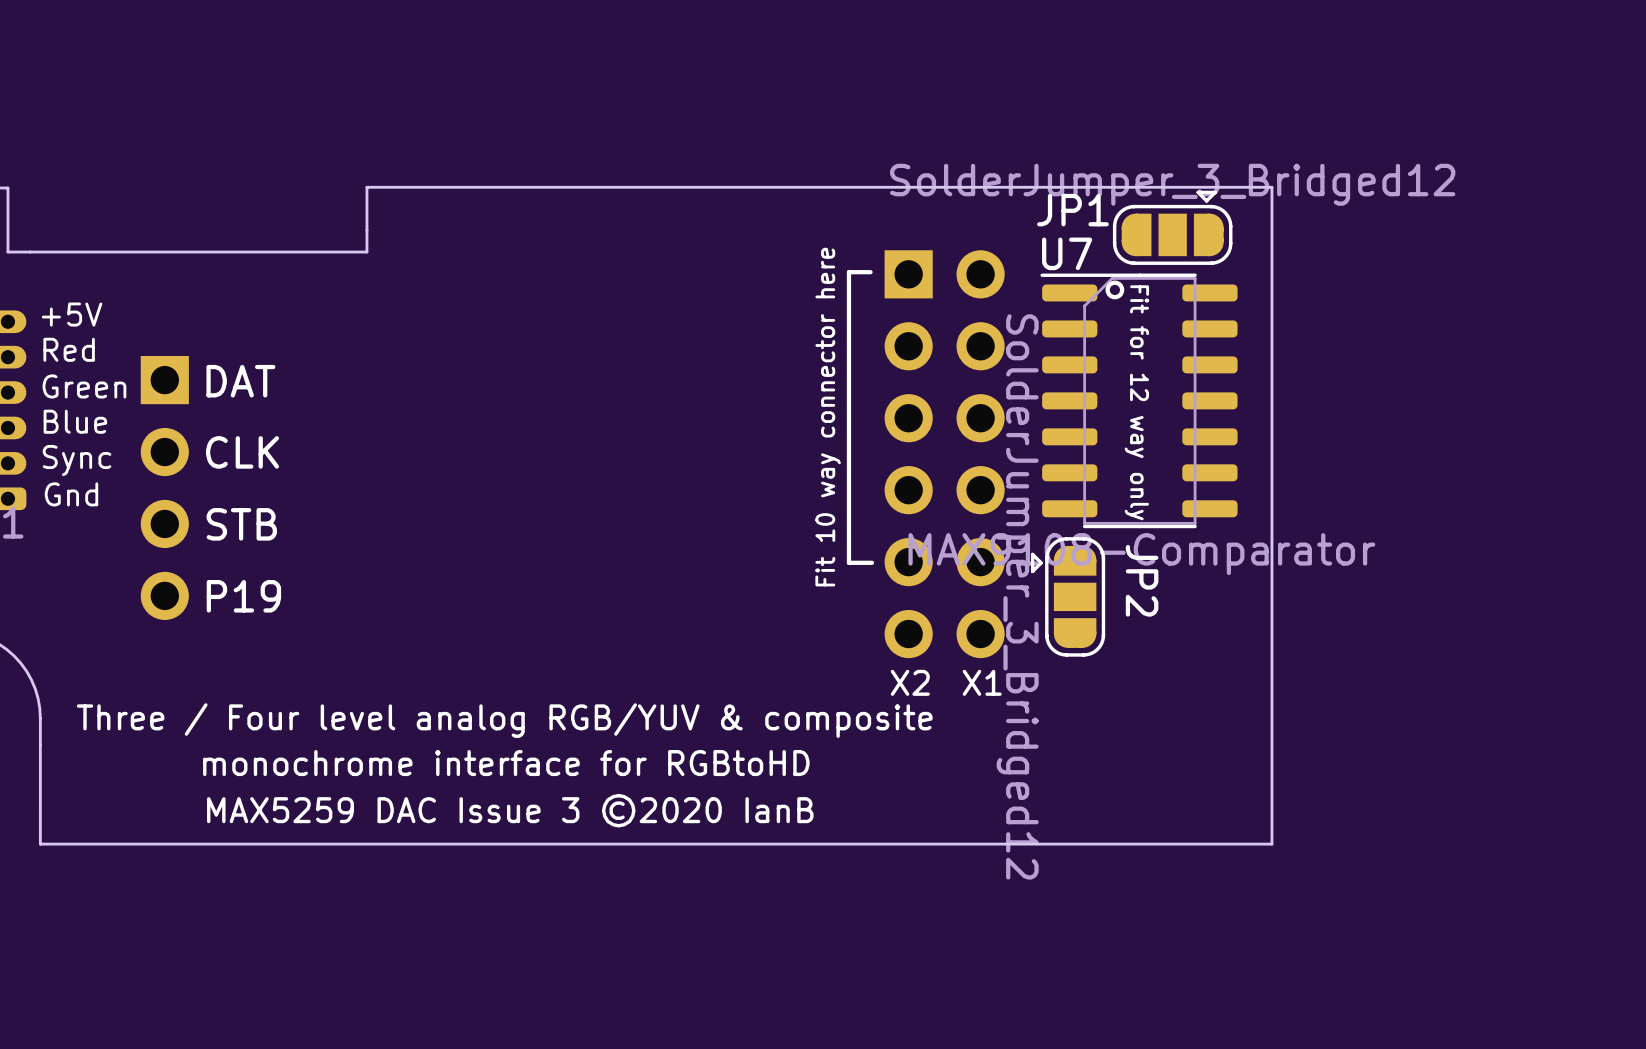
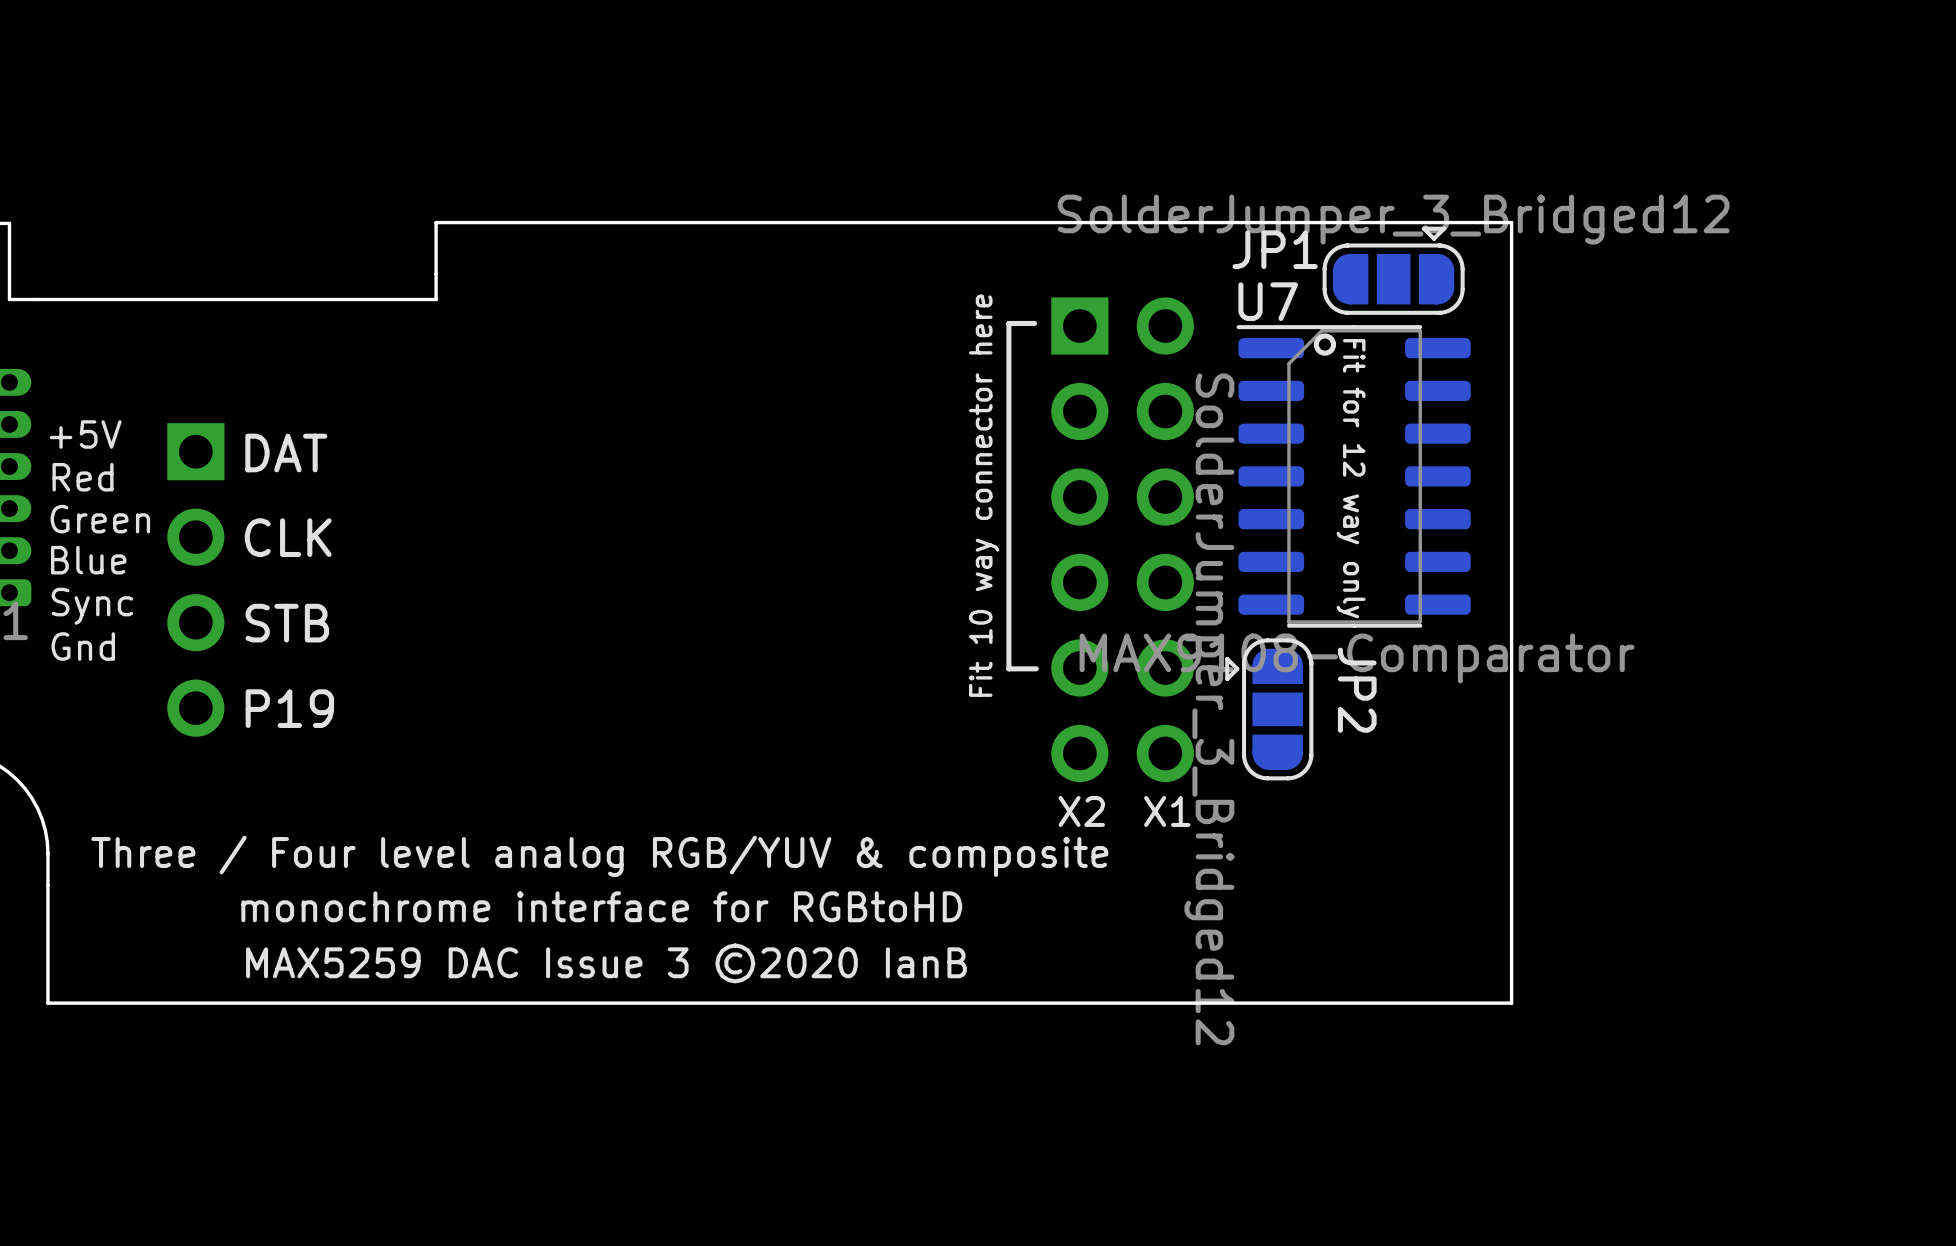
text position: +5V (72, 314) -> +5V (85, 434)
text position: Red (69, 349) -> Red (83, 477)
text position: Green (84, 386) -> Green (100, 519)
text position: Blue (75, 421) -> Blue (88, 560)
text position: Sync (77, 460) -> Sync (92, 606)
text position: Gnd (71, 494) -> Gnd (83, 646)

